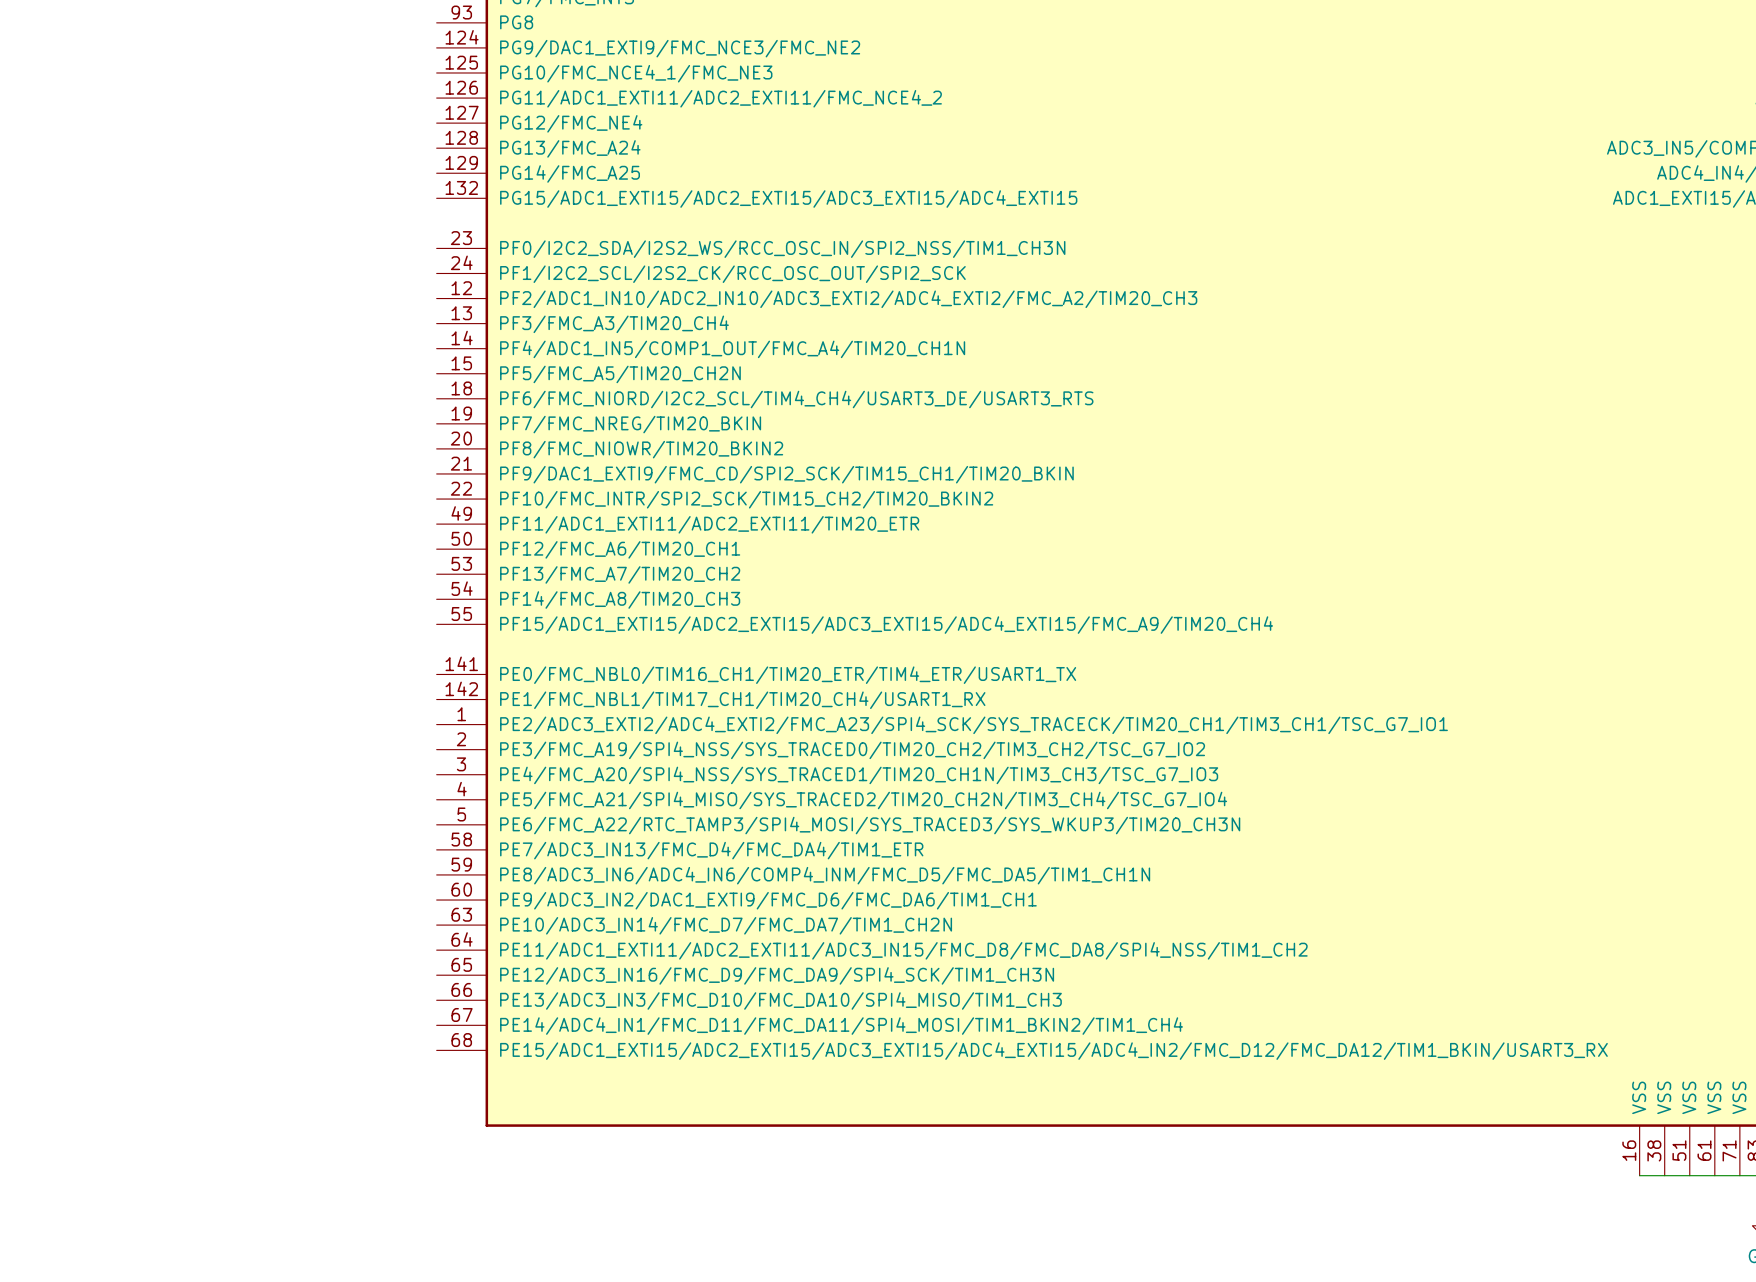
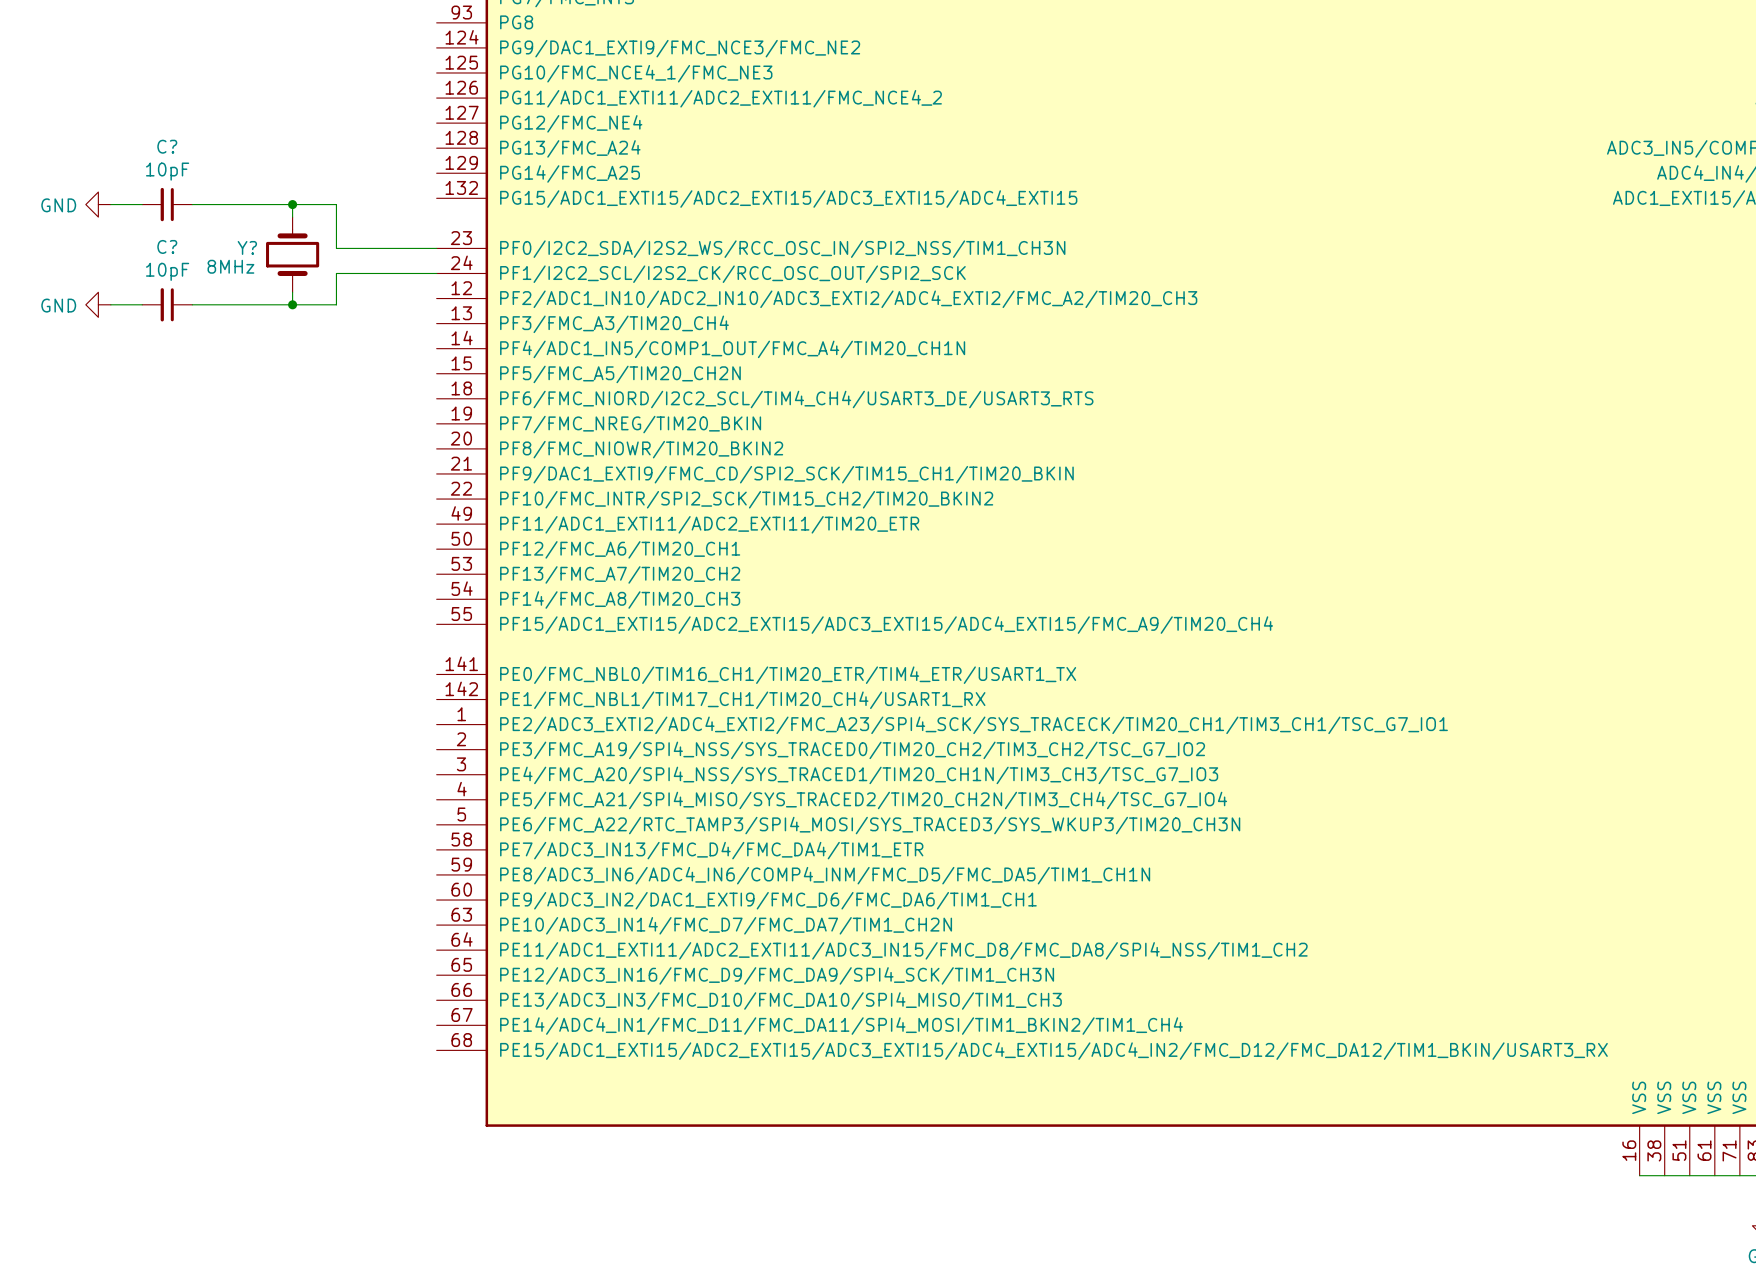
power symbol: none -> GND (98, 204)
wire: none -> (110, 204) (142, 204)
C?: none -> 10pF (167, 204)
wire: none -> (192, 204) (336, 204) (336, 248) (436, 248)
wire: none -> (292, 204) (292, 217)
junction: none -> (292, 204)
Y?: none -> 8MHz (292, 254)
wire: none -> (436, 273) (336, 273) (336, 304) (192, 304)
wire: none -> (292, 292) (292, 304)
power symbol: none -> GND (98, 304)
wire: none -> (110, 304) (142, 304)
C?: none -> 10pF (167, 304)
junction: none -> (292, 304)

